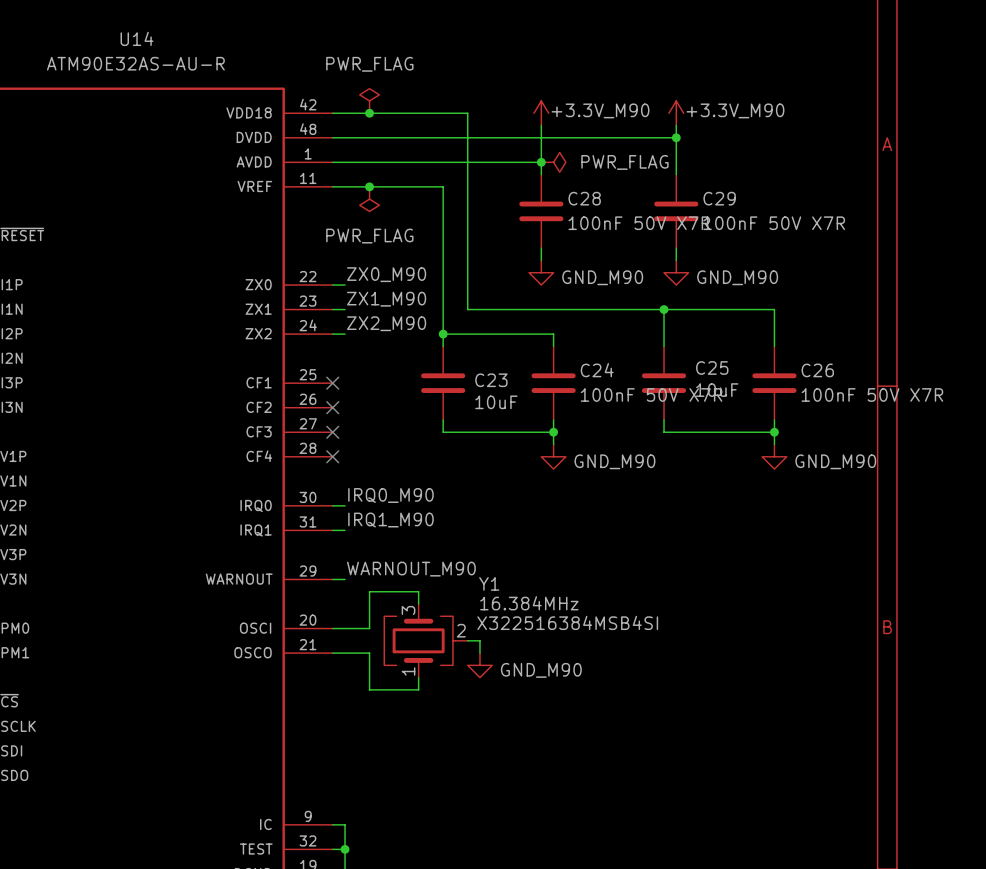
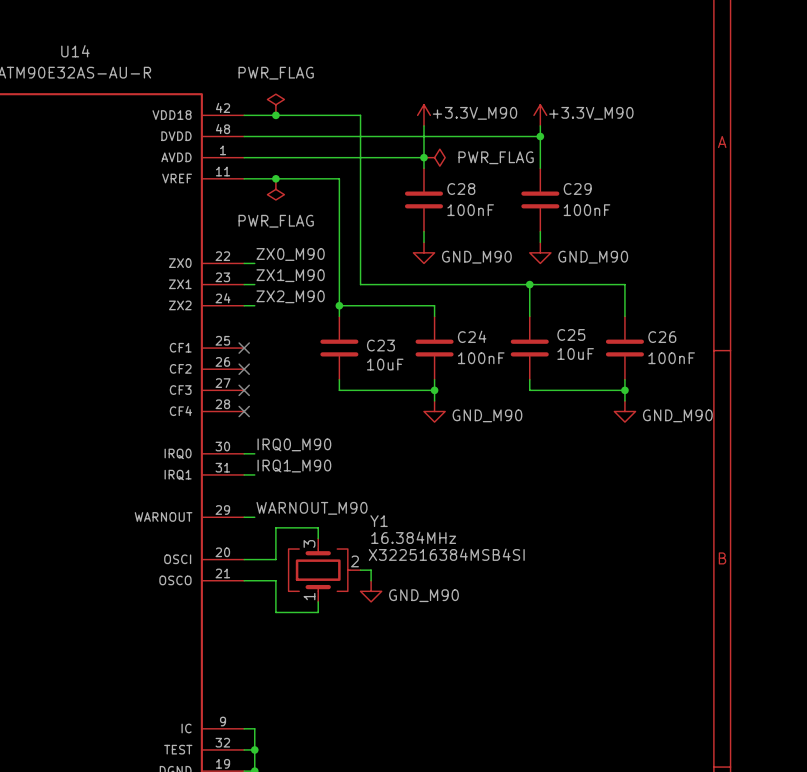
C28 value: 100nF 50V X7R (639, 223) -> 100nF (470, 210)
C29 value: 100nF 50V X7R (774, 223) -> 100nF (587, 210)
C24 value: 100nF 50V X7R (651, 394) -> 100nF (481, 358)
C26 value: 100nF 50V X7R (872, 394) -> 100nF (671, 358)

